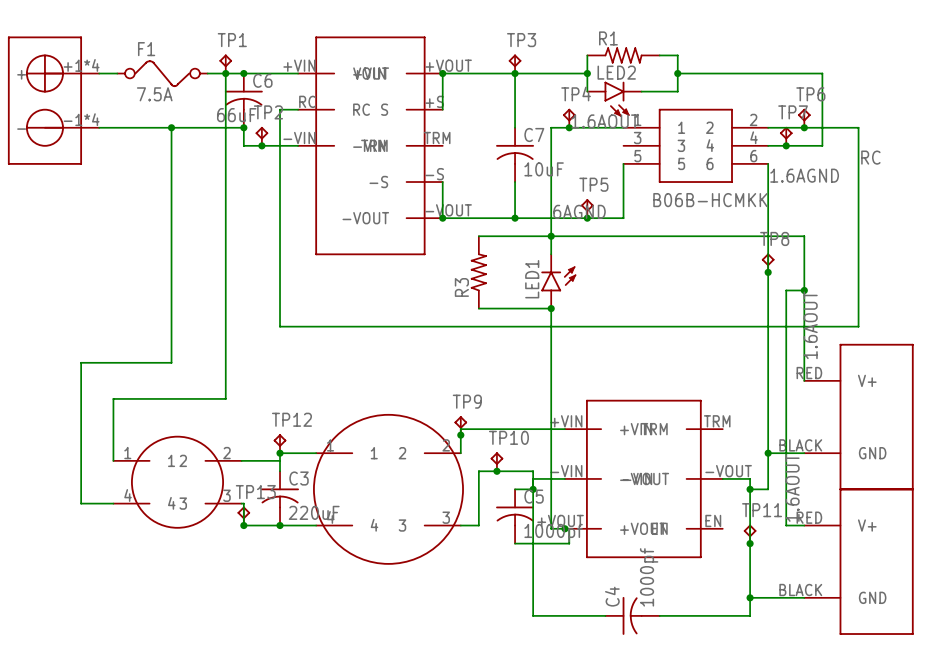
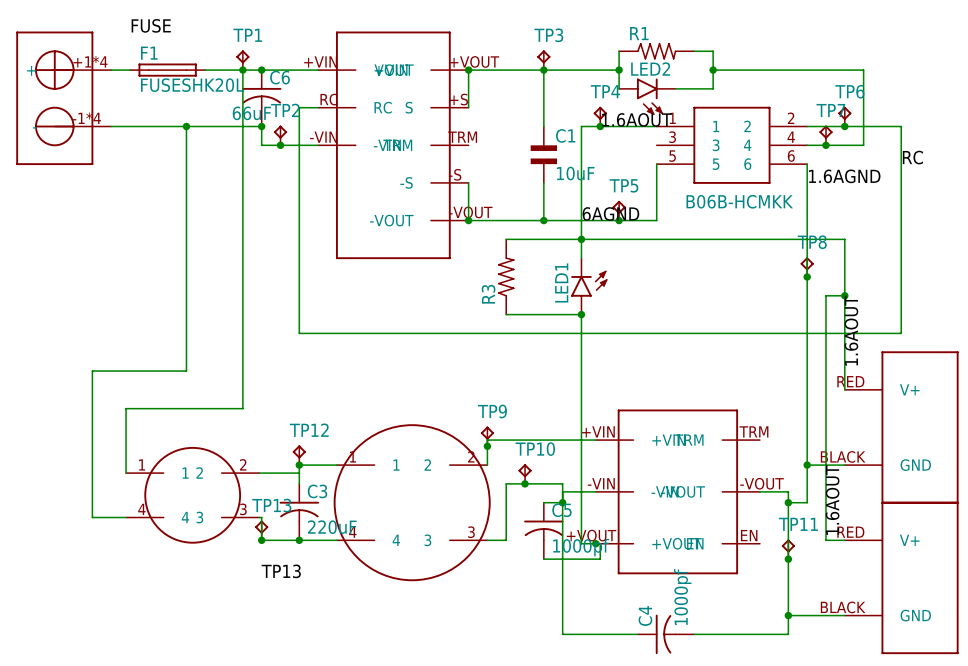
label: none -> FUSE (151, 25)
F1 symbol: [117, 60, 208, 88] -> [130, 63, 206, 77]
F1 value: 7.5A (154, 94) -> FUSESHK20L (192, 85)
C7: 10uF (515, 154) -> none
C1: none -> 10uF (543, 154)
label: none -> TP13 (281, 571)

